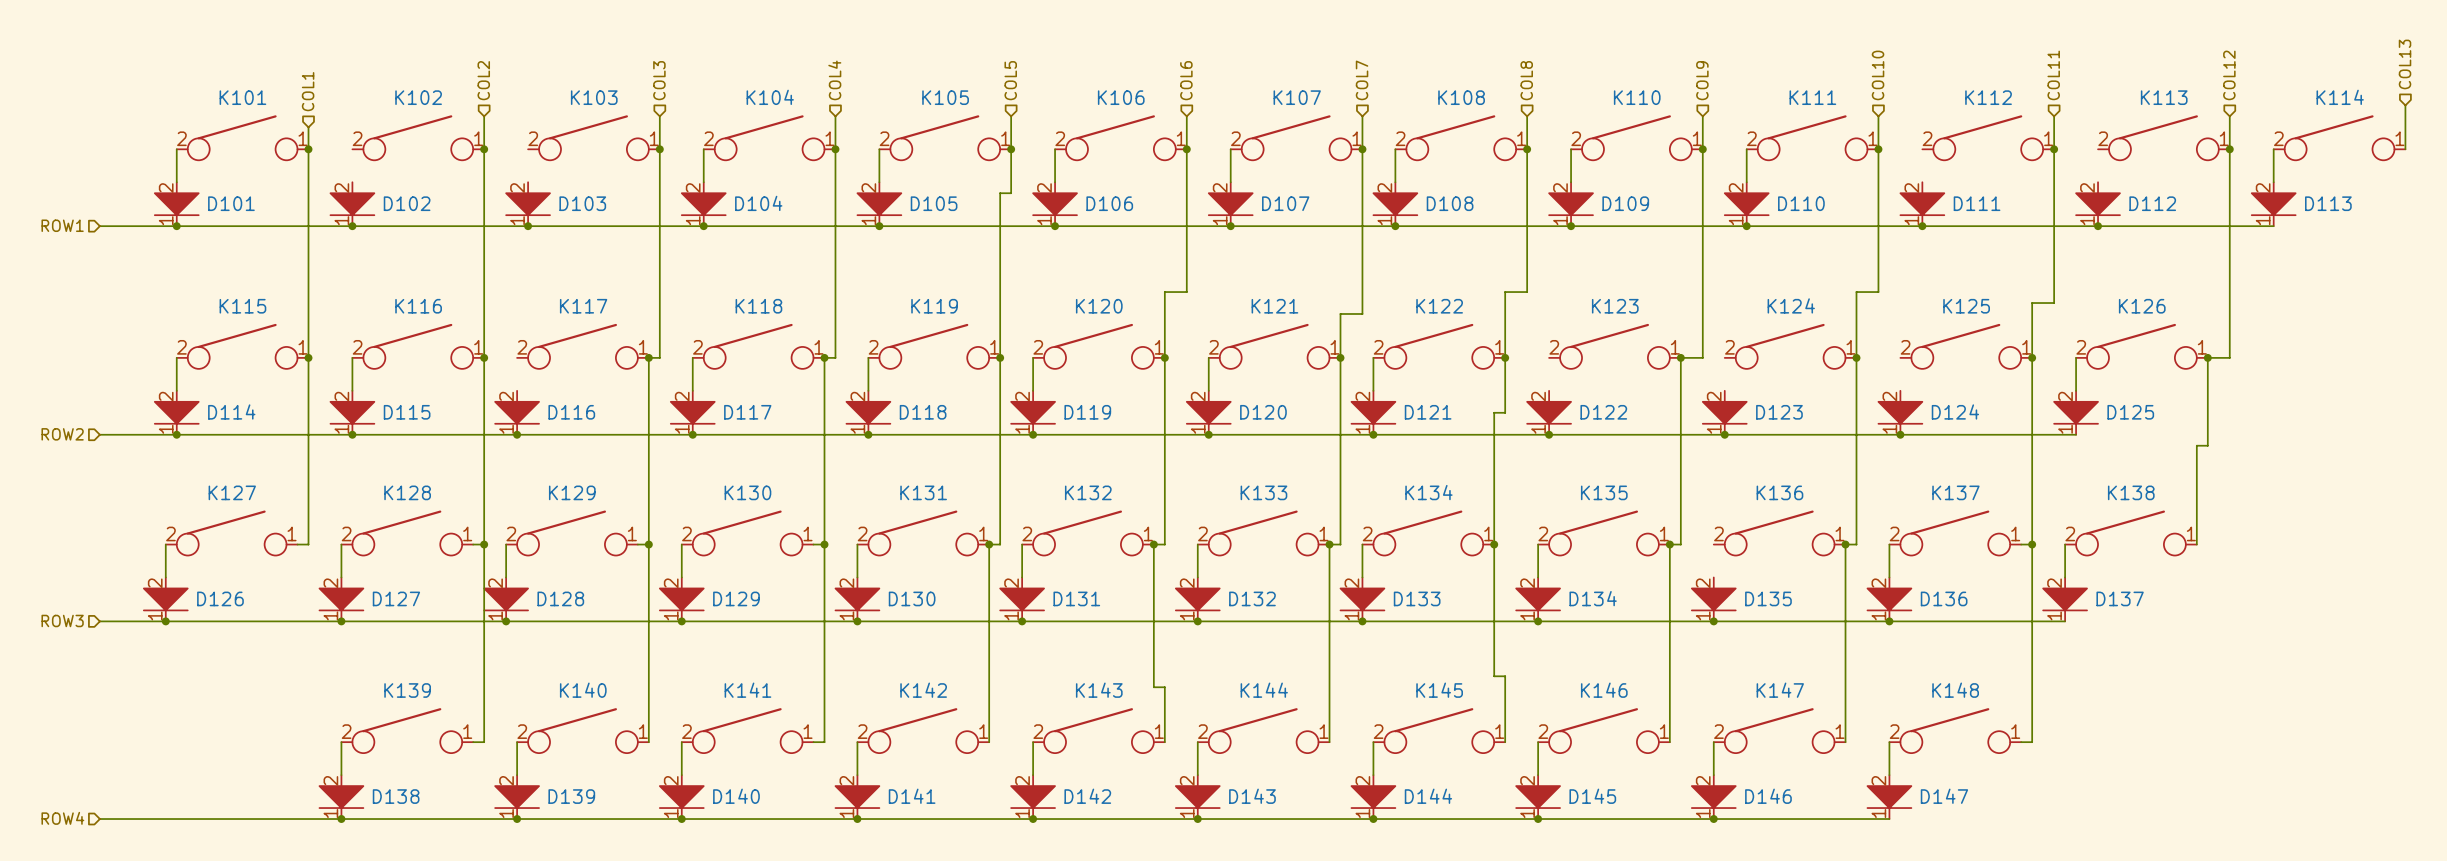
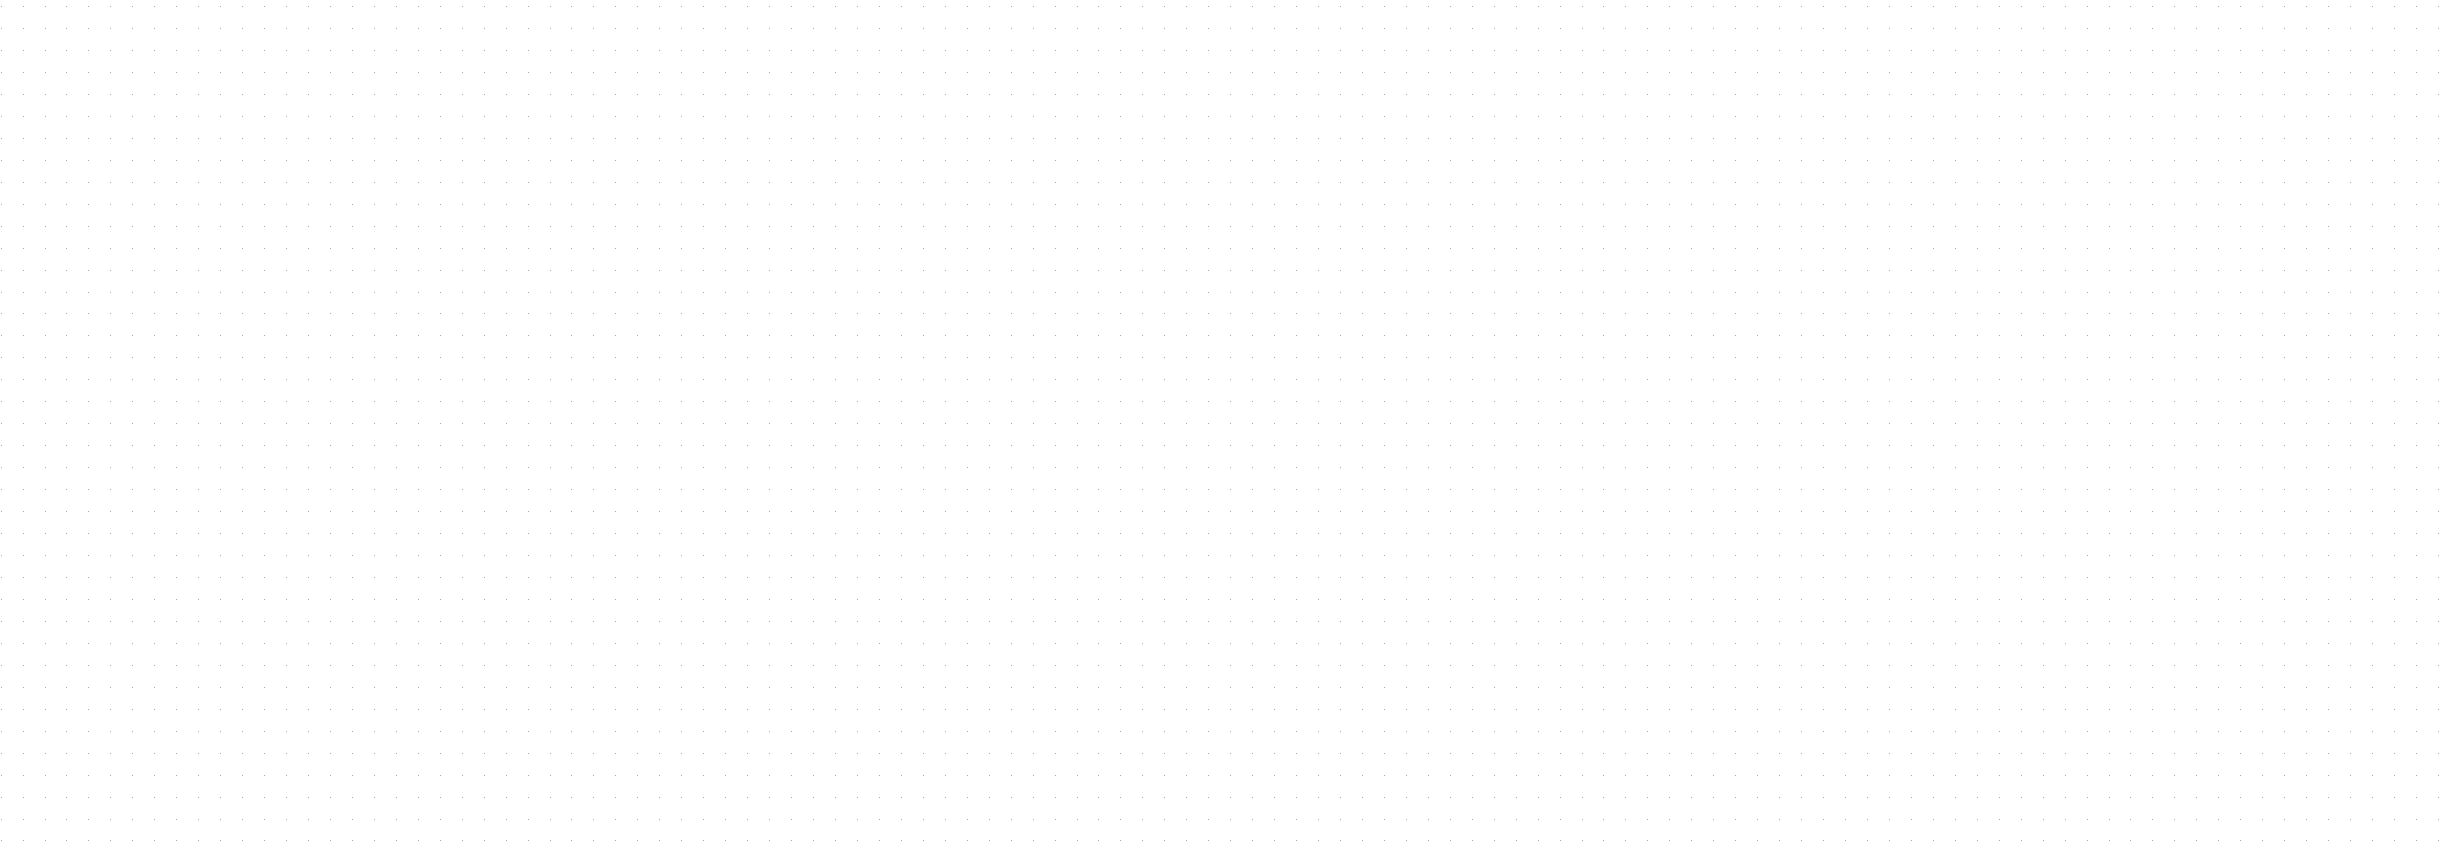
hierarchical label: COL13 (2405, 64) -> none
hierarchical label: COL10 (1878, 75) -> none
hierarchical label: COL11 (2053, 75) -> none
hierarchical label: COL12 (2229, 75) -> none
hierarchical label: COL2 (483, 80) -> none
hierarchical label: COL3 (659, 80) -> none
hierarchical label: COL4 (834, 80) -> none
hierarchical label: COL5 (1010, 80) -> none
hierarchical label: COL6 (1186, 80) -> none
hierarchical label: COL7 (1362, 80) -> none
hierarchical label: COL8 (1526, 80) -> none
hierarchical label: COL9 (1702, 80) -> none
hierarchical label: COL1 (308, 91) -> none
wire: (2405, 105) (2405, 149) -> none
wire: (484, 116) (484, 742) (473, 742) -> none
wire: (659, 116) (659, 357) (648, 357) (648, 742) -> none
wire: (835, 116) (835, 357) (824, 357) (824, 742) (813, 742) -> none
wire: (1011, 116) (1011, 193) (1000, 193) (1000, 544) (989, 544) (989, 742) -> none
wire: (1186, 116) (1186, 292) (1164, 292) (1164, 544) (1153, 544) (1153, 687) (1164, 687) (1164, 742) -> none
wire: (1362, 116) (1362, 313) (1340, 313) (1340, 544) (1329, 544) (1329, 742) -> none
wire: (1527, 116) (1527, 292) (1505, 292) (1505, 412) (1494, 412) (1494, 676) (1505, 676) (1505, 742) -> none
wire: (1702, 116) (1702, 357) (1680, 357) (1680, 544) (1669, 544) (1669, 742) -> none
wire: (1878, 116) (1878, 292) (1856, 292) (1856, 544) (1845, 544) (1845, 742) -> none
wire: (2054, 116) (2054, 303) (2032, 303) (2032, 742) (2021, 742) -> none
wire: (2229, 116) (2229, 357) (2207, 357) (2207, 445) (2196, 445) (2196, 544) -> none
wire: (308, 127) (308, 544) (297, 544) -> none
K101: (242, 137) -> none
K102: (418, 137) -> none
K103: (593, 137) -> none
K104: (769, 137) -> none
K105: (945, 137) -> none
K106: (1120, 137) -> none
K107: (1296, 137) -> none
K108: (1461, 137) -> none
K110: (1636, 137) -> none
K111: (1812, 137) -> none
K112: (1988, 137) -> none
K113: (2163, 137) -> none
K114: (2339, 137) -> none
wire: (176, 149) (176, 182) -> none
junction: (308, 149) -> none
junction: (484, 149) -> none
junction: (659, 149) -> none
wire: (703, 149) (703, 182) -> none
junction: (835, 149) -> none
wire: (879, 149) (879, 182) -> none
junction: (1011, 149) -> none
wire: (1055, 149) (1055, 182) -> none
junction: (1186, 149) -> none
wire: (1230, 149) (1230, 182) -> none
junction: (1362, 149) -> none
wire: (1395, 149) (1395, 182) -> none
junction: (1527, 149) -> none
wire: (1571, 149) (1571, 182) -> none
junction: (1702, 149) -> none
wire: (1746, 149) (1746, 182) -> none
junction: (1878, 149) -> none
junction: (2054, 149) -> none
junction: (2229, 149) -> none
wire: (2273, 149) (2273, 182) -> none
D101: (176, 204) -> none
D102: (352, 204) -> none
D103: (528, 204) -> none
D104: (703, 204) -> none
D105: (879, 204) -> none
D106: (1055, 204) -> none
D107: (1230, 204) -> none
D108: (1395, 204) -> none
D109: (1571, 204) -> none
D110: (1746, 204) -> none
D111: (1922, 204) -> none
D112: (2098, 204) -> none
D113: (2273, 204) -> none
hierarchical label: ROW1 (62, 225) -> none
wire: (99, 226) (2273, 226) -> none
junction: (176, 226) -> none
junction: (352, 226) -> none
junction: (528, 226) -> none
junction: (703, 226) -> none
junction: (879, 226) -> none
junction: (1055, 226) -> none
junction: (1230, 226) -> none
junction: (1395, 226) -> none
junction: (1571, 226) -> none
junction: (1746, 226) -> none
junction: (1922, 226) -> none
junction: (2098, 226) -> none
K115: (242, 346) -> none
K116: (418, 346) -> none
K117: (582, 346) -> none
K118: (758, 346) -> none
K119: (934, 346) -> none
K120: (1098, 346) -> none
K121: (1274, 346) -> none
K122: (1439, 346) -> none
K123: (1614, 346) -> none
K124: (1790, 346) -> none
K125: (1966, 346) -> none
K126: (2141, 346) -> none
wire: (176, 357) (176, 390) -> none
junction: (308, 357) -> none
wire: (352, 357) (352, 390) -> none
junction: (484, 357) -> none
junction: (648, 357) -> none
wire: (692, 357) (692, 390) -> none
junction: (824, 357) -> none
wire: (868, 357) (868, 390) -> none
junction: (1000, 357) -> none
wire: (1033, 357) (1033, 390) -> none
junction: (1164, 357) -> none
wire: (1208, 357) (1208, 390) -> none
junction: (1340, 357) -> none
wire: (1373, 357) (1373, 390) -> none
junction: (1505, 357) -> none
junction: (1680, 357) -> none
junction: (1856, 357) -> none
junction: (2032, 357) -> none
wire: (2076, 357) (2076, 390) -> none
junction: (2207, 357) -> none
D114: (176, 412) -> none
D115: (352, 412) -> none
D116: (517, 412) -> none
D117: (692, 412) -> none
D118: (868, 412) -> none
D119: (1033, 412) -> none
D120: (1208, 412) -> none
D121: (1373, 412) -> none
D122: (1549, 412) -> none
D123: (1724, 412) -> none
D124: (1900, 412) -> none
D125: (2076, 412) -> none
hierarchical label: ROW2 (62, 434) -> none
wire: (99, 434) (2076, 434) -> none
junction: (176, 434) -> none
junction: (352, 434) -> none
junction: (517, 434) -> none
junction: (692, 434) -> none
junction: (868, 434) -> none
junction: (1033, 434) -> none
junction: (1208, 434) -> none
junction: (1373, 434) -> none
junction: (1549, 434) -> none
junction: (1724, 434) -> none
junction: (1900, 434) -> none
K127: (231, 533) -> none
K128: (407, 533) -> none
K129: (571, 533) -> none
K130: (747, 533) -> none
K131: (923, 533) -> none
K132: (1087, 533) -> none
K133: (1263, 533) -> none
K134: (1428, 533) -> none
K135: (1603, 533) -> none
K136: (1779, 533) -> none
K137: (1955, 533) -> none
K138: (2130, 533) -> none
wire: (165, 544) (165, 577) -> none
wire: (341, 544) (341, 577) -> none
wire: (473, 544) (484, 544) -> none
junction: (484, 544) -> none
wire: (506, 544) (506, 577) -> none
wire: (637, 544) (648, 544) -> none
junction: (648, 544) -> none
wire: (681, 544) (681, 577) -> none
wire: (813, 544) (824, 544) -> none
junction: (824, 544) -> none
wire: (857, 544) (857, 577) -> none
junction: (989, 544) -> none
wire: (1022, 544) (1022, 577) -> none
junction: (1153, 544) -> none
wire: (1197, 544) (1197, 577) -> none
junction: (1329, 544) -> none
wire: (1362, 544) (1362, 577) -> none
junction: (1494, 544) -> none
wire: (1538, 544) (1538, 577) -> none
junction: (1669, 544) -> none
junction: (1845, 544) -> none
wire: (1889, 544) (1889, 577) -> none
wire: (2021, 544) (2032, 544) -> none
junction: (2032, 544) -> none
wire: (2065, 544) (2065, 577) -> none
D126: (165, 599) -> none
D127: (341, 599) -> none
D128: (506, 599) -> none
D129: (681, 599) -> none
D130: (857, 599) -> none
D131: (1022, 599) -> none
D132: (1197, 599) -> none
D133: (1362, 599) -> none
D134: (1538, 599) -> none
D135: (1713, 599) -> none
D136: (1889, 599) -> none
D137: (2065, 599) -> none
hierarchical label: ROW3 (62, 620) -> none
wire: (99, 621) (2065, 621) -> none
junction: (165, 621) -> none
junction: (341, 621) -> none
junction: (506, 621) -> none
junction: (681, 621) -> none
junction: (857, 621) -> none
junction: (1022, 621) -> none
junction: (1197, 621) -> none
junction: (1362, 621) -> none
junction: (1538, 621) -> none
junction: (1713, 621) -> none
junction: (1889, 621) -> none
K139: (407, 730) -> none
K140: (582, 730) -> none
K141: (747, 730) -> none
K142: (923, 730) -> none
K143: (1098, 730) -> none
K144: (1263, 730) -> none
K145: (1439, 730) -> none
K146: (1603, 730) -> none
K147: (1779, 730) -> none
K148: (1955, 730) -> none
wire: (341, 742) (341, 775) -> none
wire: (517, 742) (517, 775) -> none
wire: (681, 742) (681, 775) -> none
wire: (857, 742) (857, 775) -> none
wire: (1033, 742) (1033, 775) -> none
wire: (1197, 742) (1197, 775) -> none
wire: (1373, 742) (1373, 775) -> none
wire: (1538, 742) (1538, 775) -> none
wire: (1713, 742) (1713, 775) -> none
wire: (1889, 742) (1889, 775) -> none
D138: (341, 797) -> none
D139: (517, 797) -> none
D140: (681, 797) -> none
D141: (857, 797) -> none
D142: (1033, 797) -> none
D143: (1197, 797) -> none
D144: (1373, 797) -> none
D145: (1538, 797) -> none
D146: (1713, 797) -> none
D147: (1889, 797) -> none
hierarchical label: ROW4 (62, 818) -> none
wire: (99, 819) (1889, 819) -> none
junction: (341, 819) -> none
junction: (517, 819) -> none
junction: (681, 819) -> none
junction: (857, 819) -> none
junction: (1033, 819) -> none
junction: (1197, 819) -> none
junction: (1373, 819) -> none
junction: (1538, 819) -> none
junction: (1713, 819) -> none

